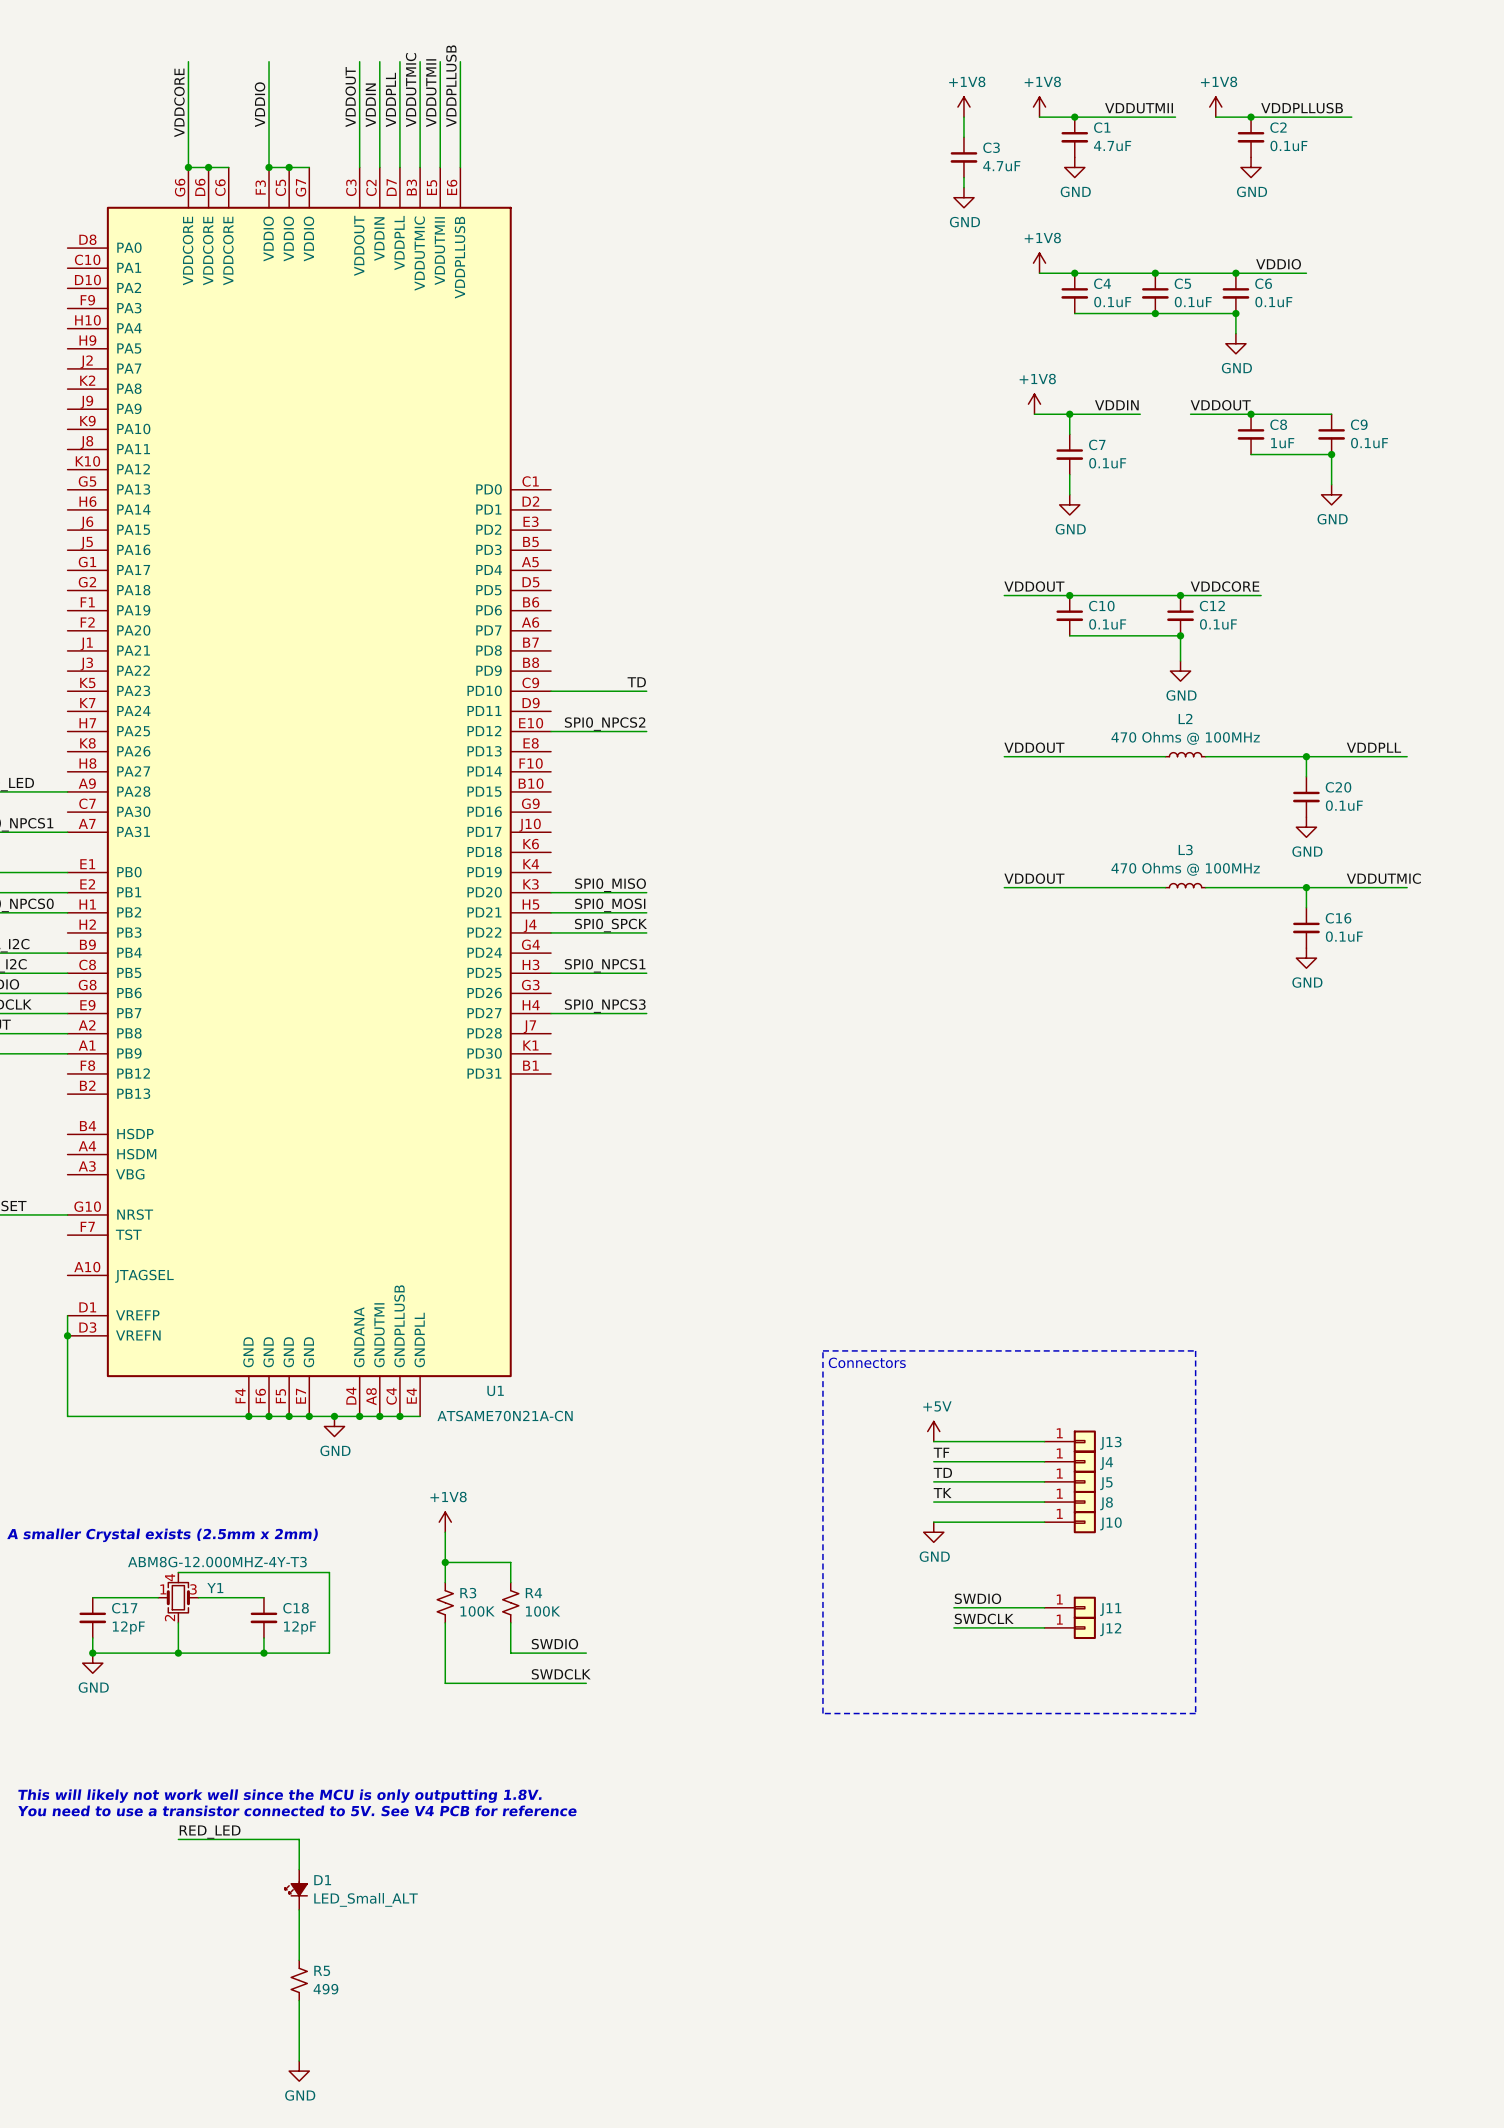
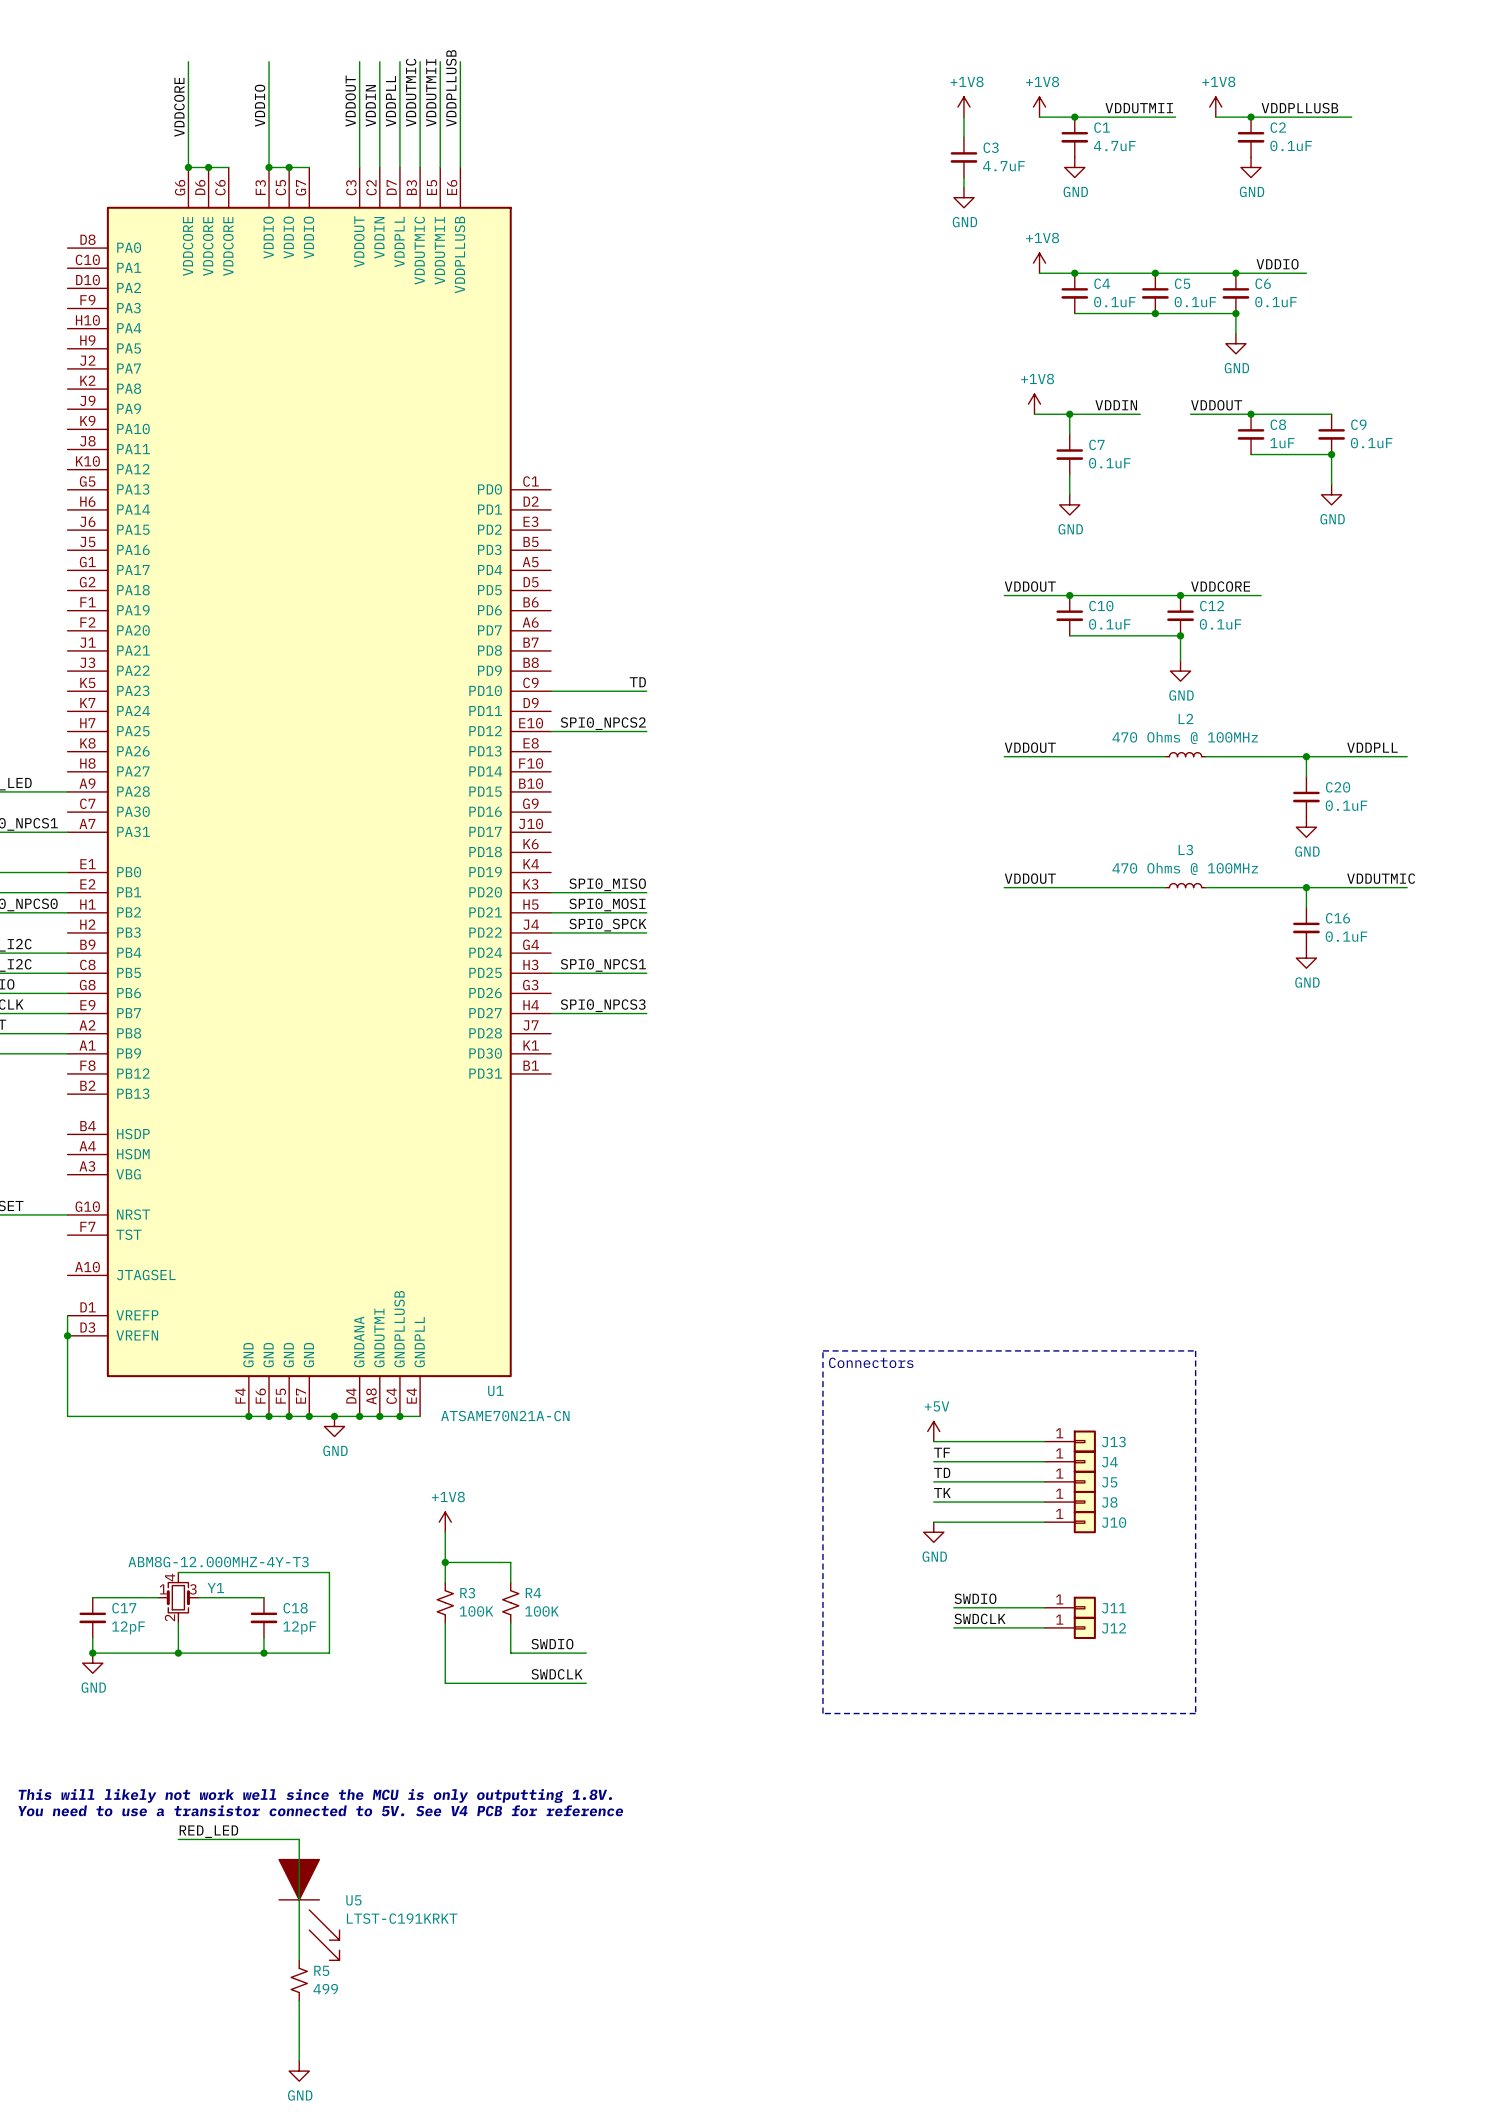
text: A smaller Crystal exists (2.5mm x 2mm) (162, 1535) -> none
D1: LED_Small_ALT (296, 1889) -> none
U5: none -> LTST-C191KRKT (309, 1909)

